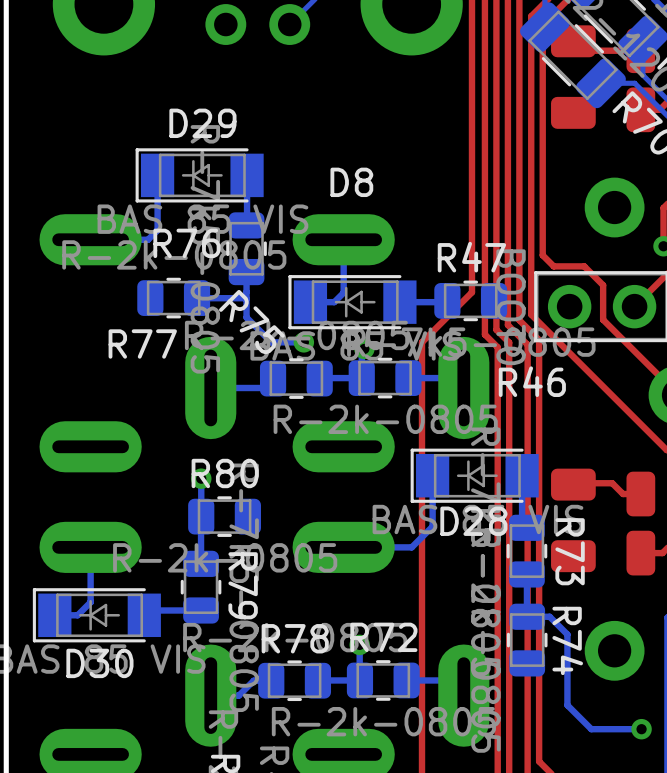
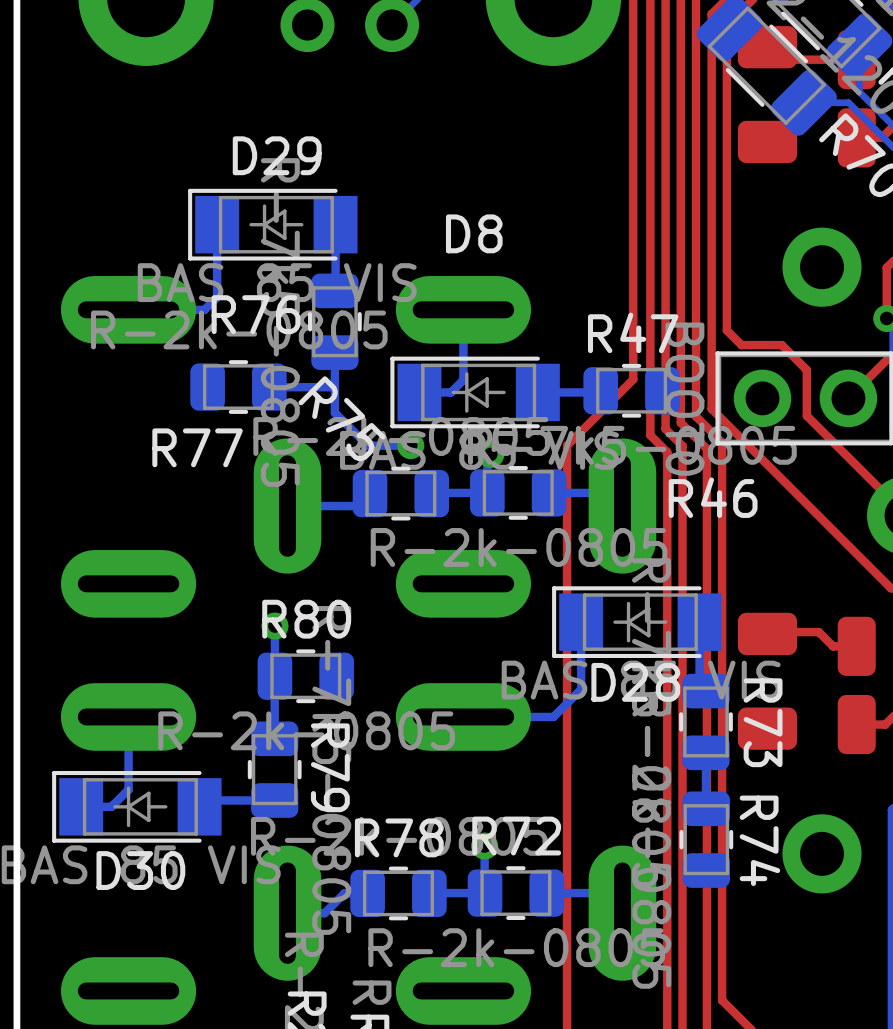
bottom track: (527, 616) (549, 616) (567, 634) (567, 705) (591, 729) (641, 729) -> none
via: (641, 729) -> none

